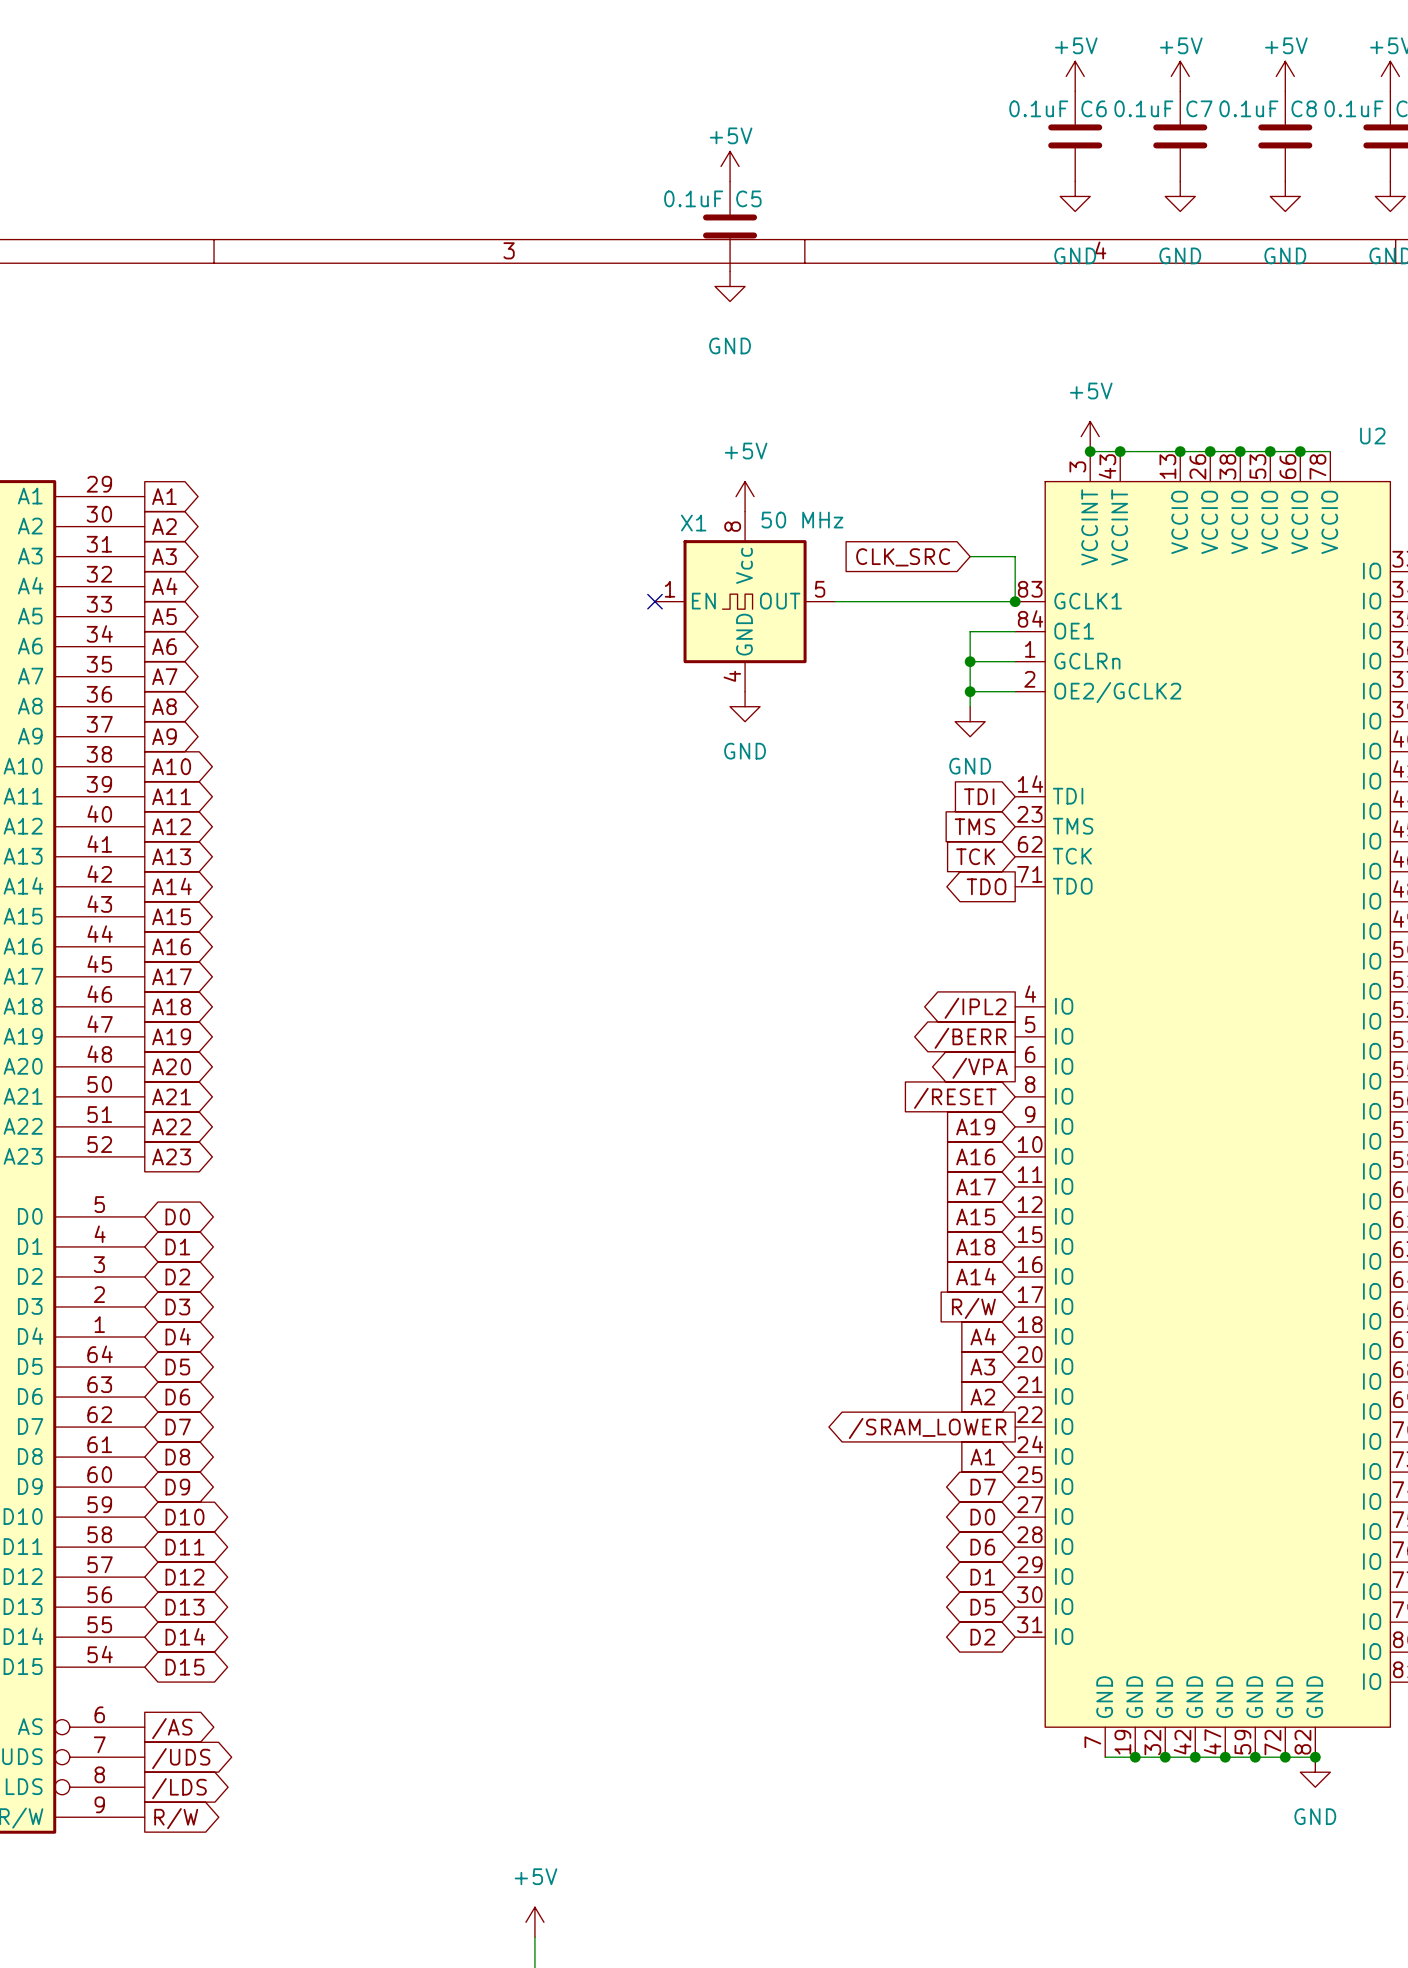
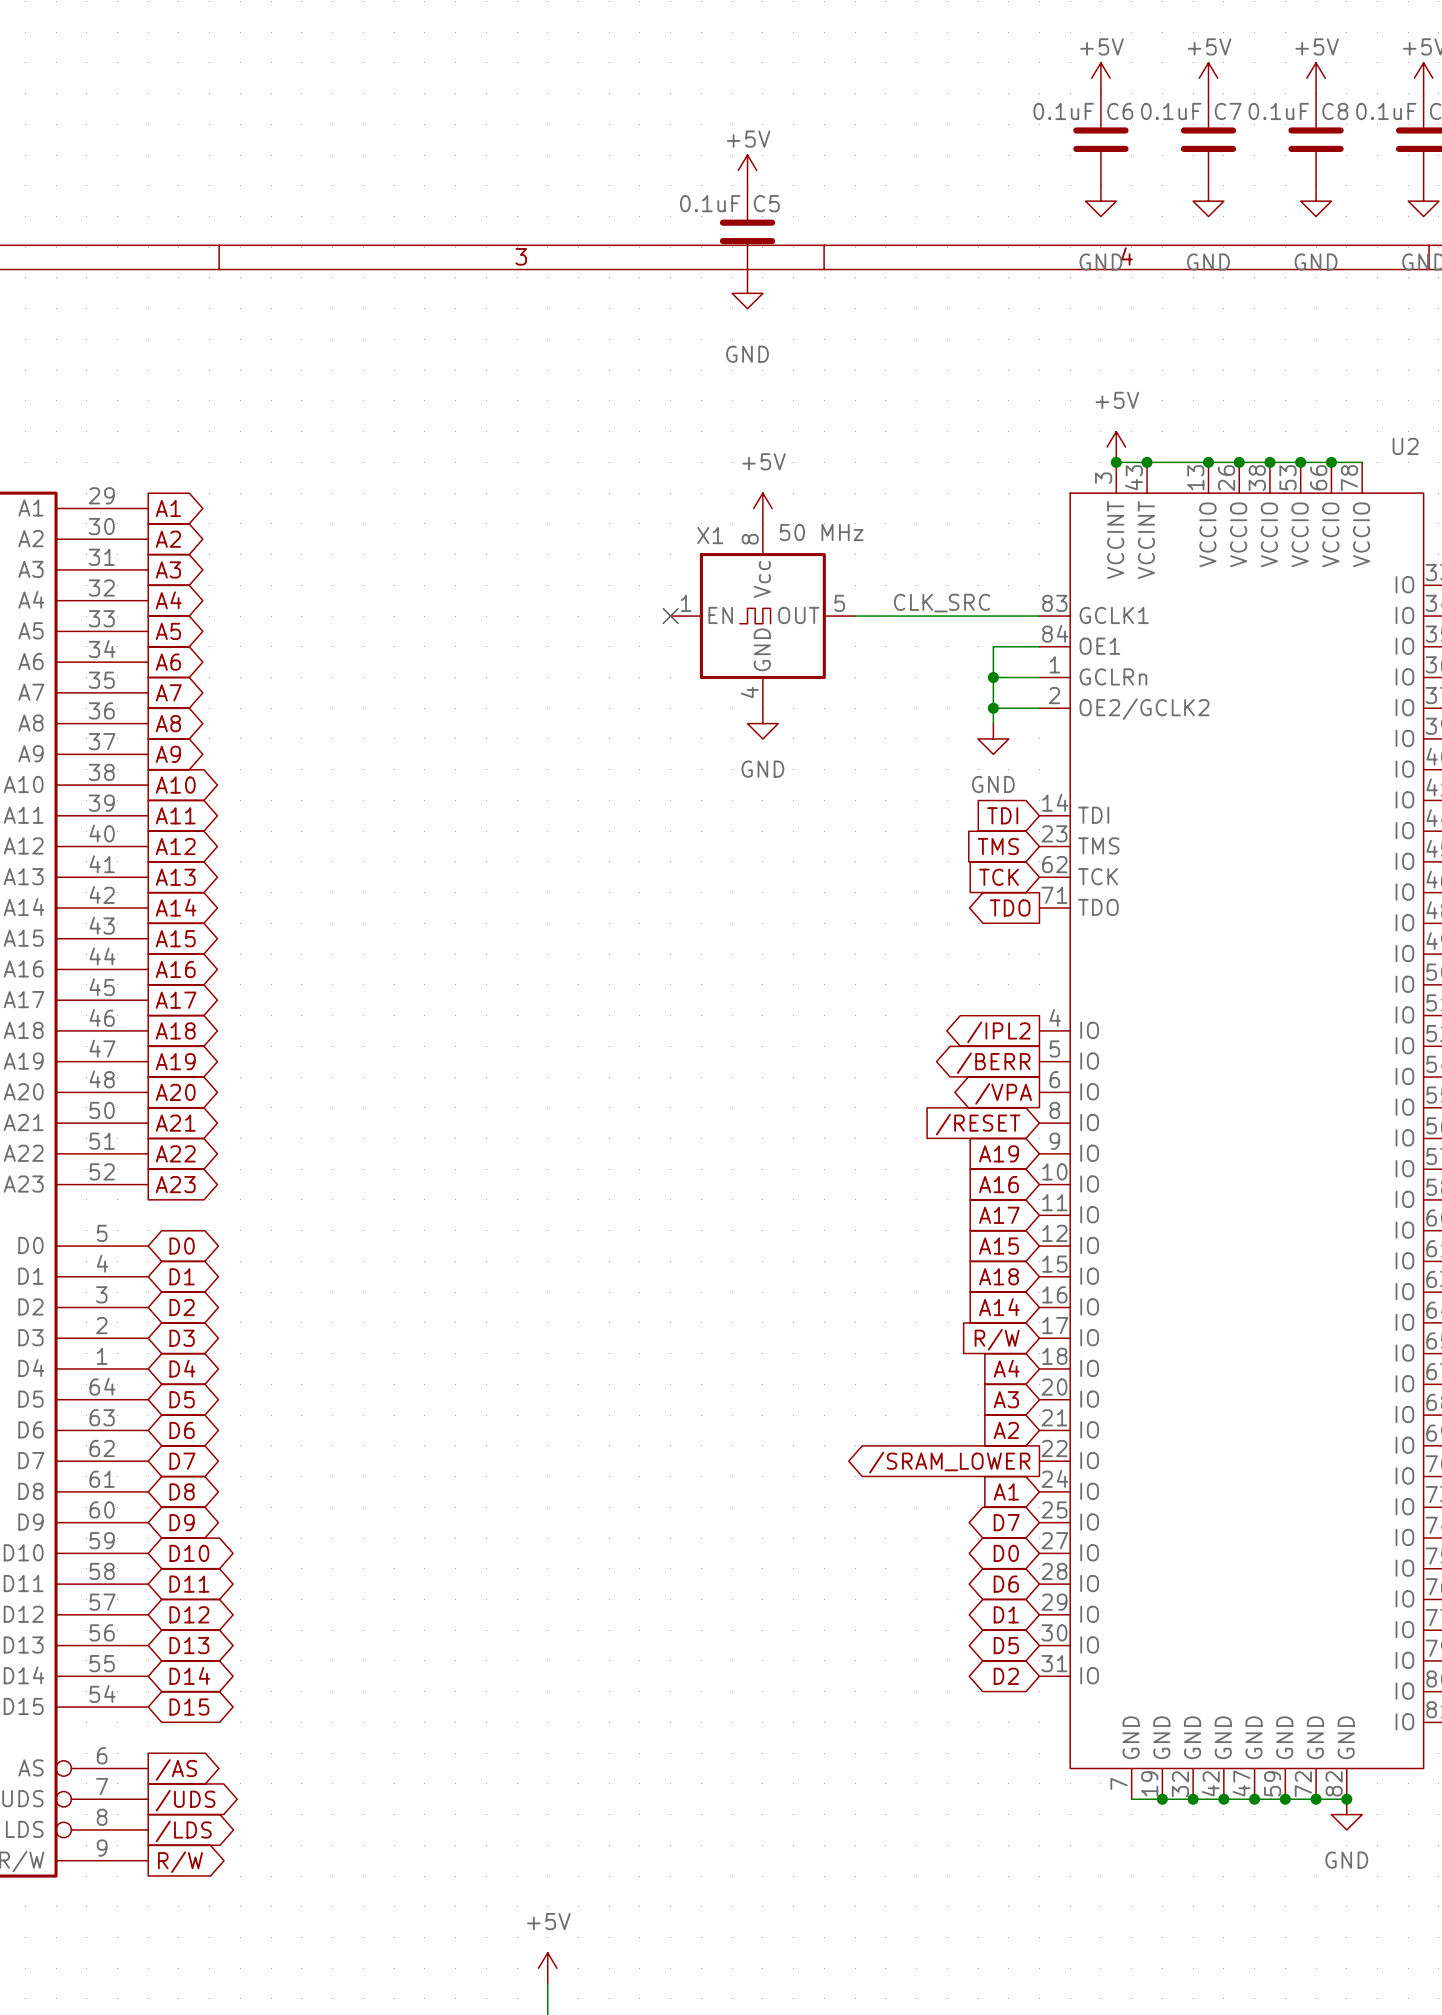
wire: (970, 556) (1015, 556) (1015, 601) -> none
global label: CLK_SRC (903, 557) -> none
label: none -> CLK_SRC (942, 603)
junction: (1015, 601) -> none

